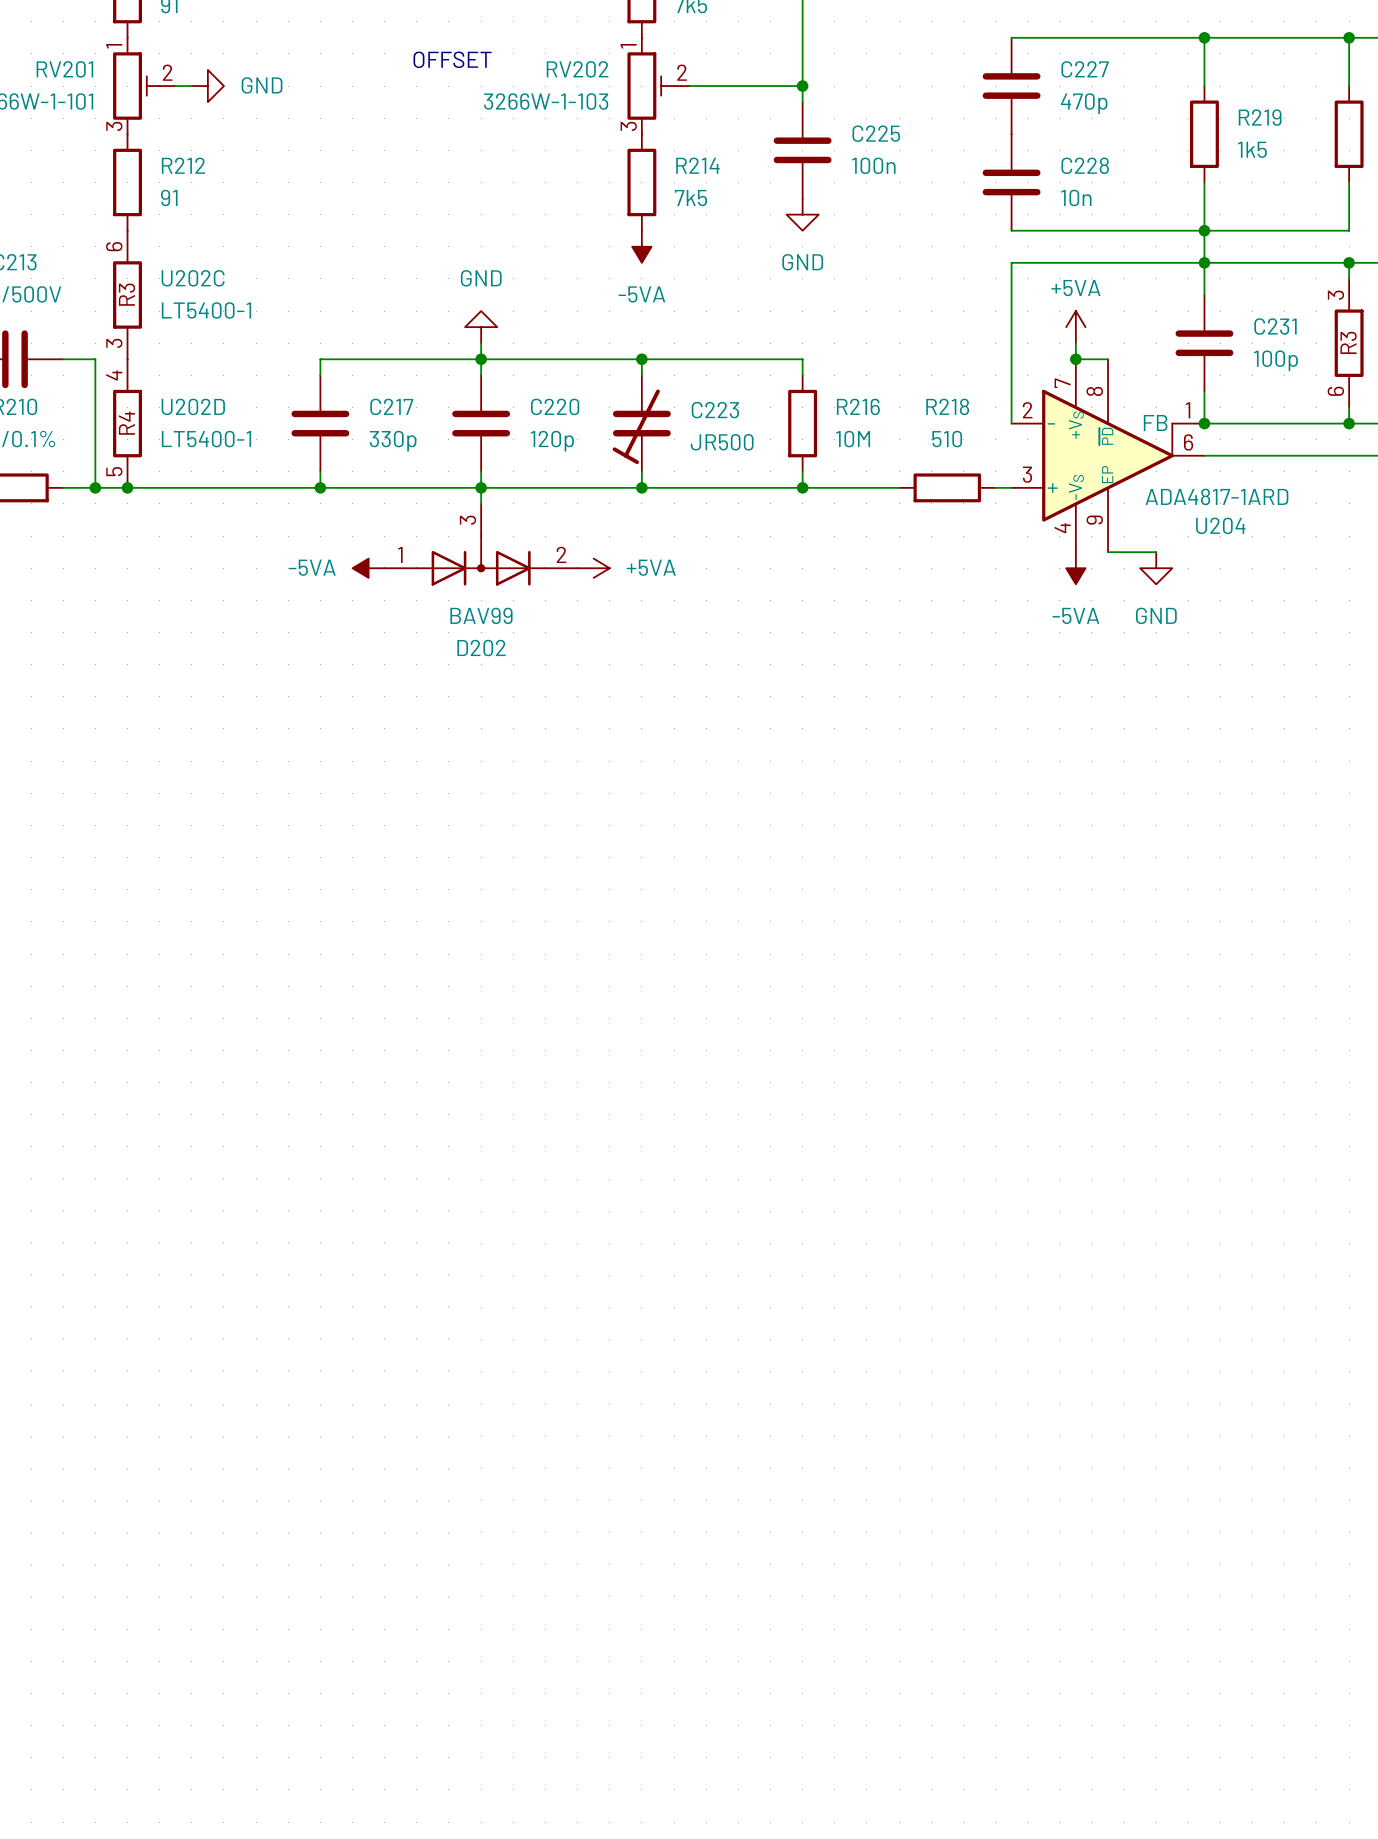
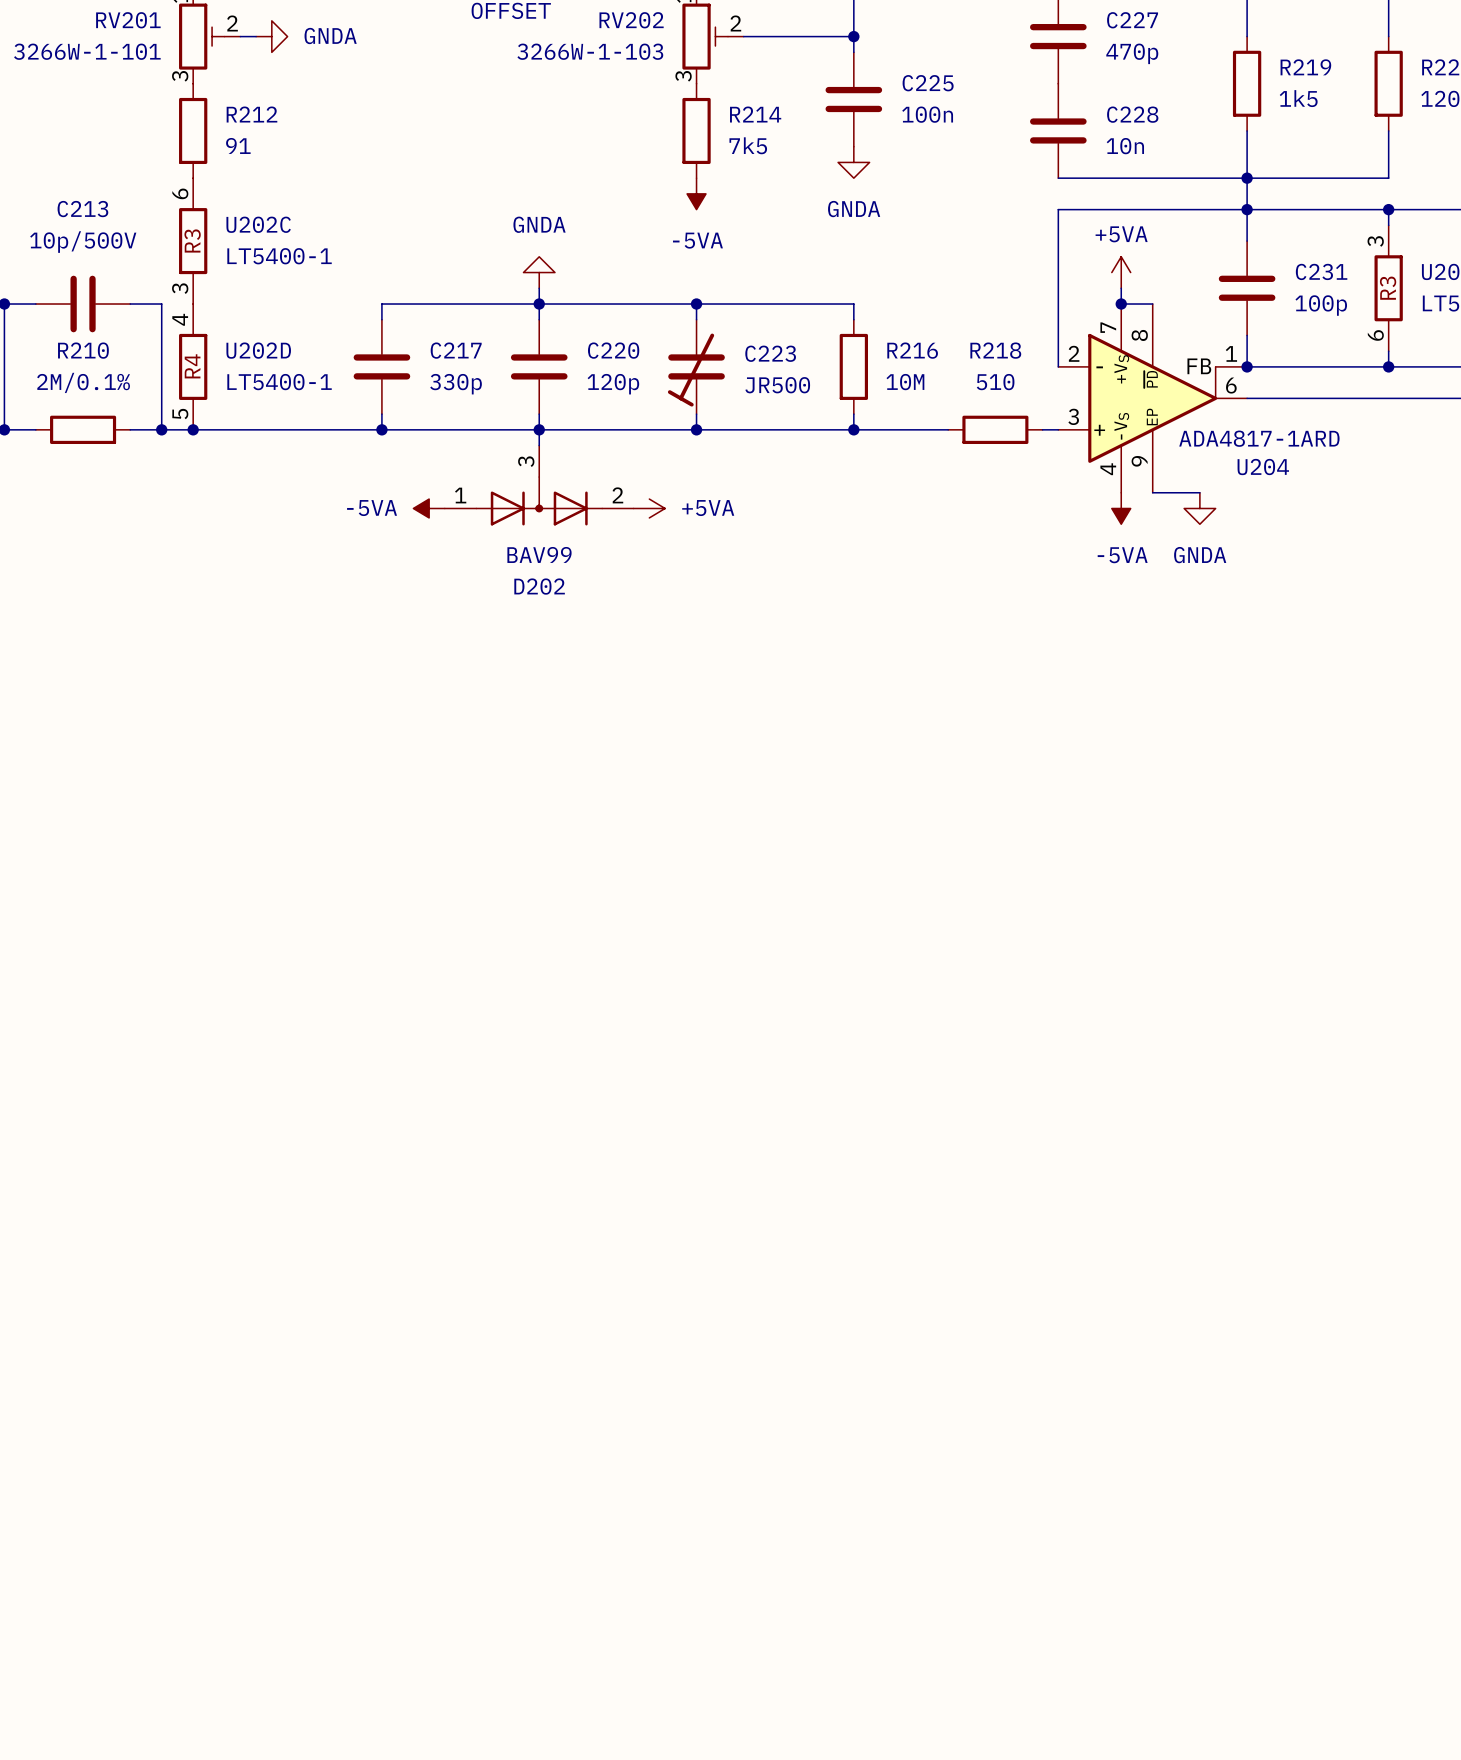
power symbol: GND (207, 86) -> GNDA (271, 36)
power symbol: GND (802, 214) -> GNDA (853, 162)
power symbol: GND (481, 327) -> GNDA (539, 272)
power symbol: GND (1156, 568) -> GNDA (1199, 508)

